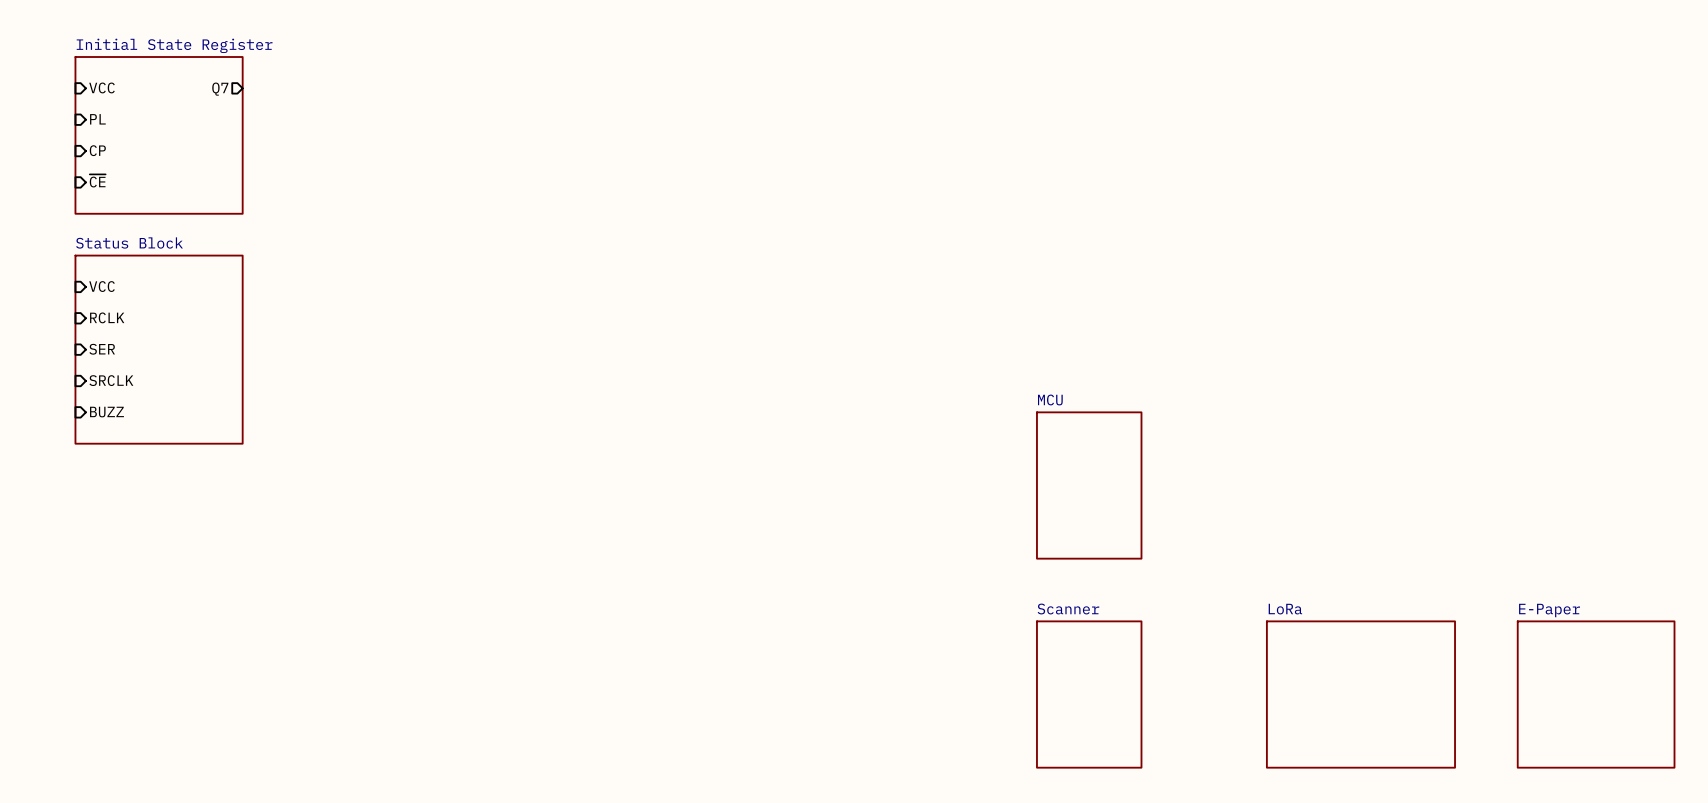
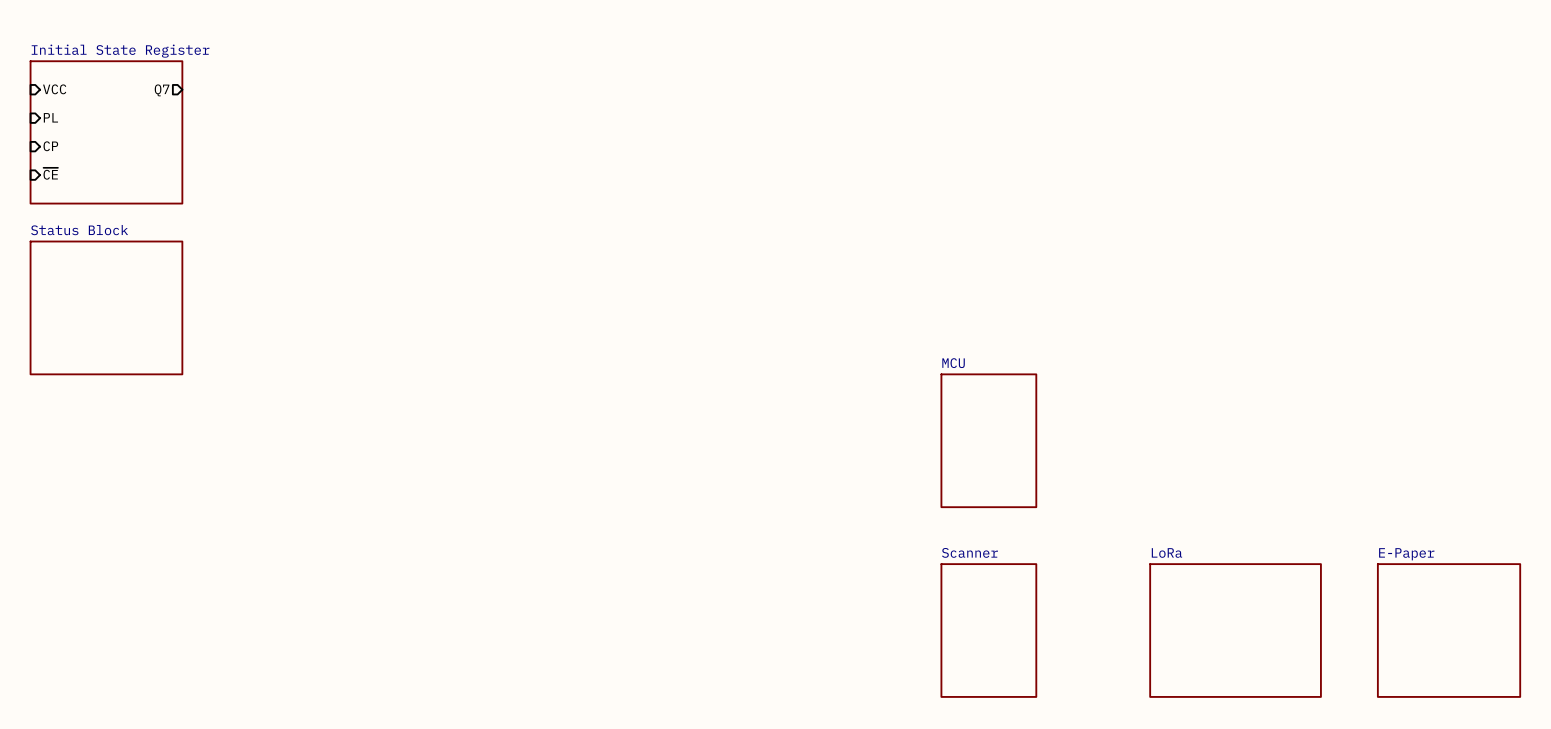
sheet pin position: VCC (102, 87) -> VCC (54, 89)
sheet pin position: Q7 (220, 89) -> Q7 (162, 90)
sheet pin position: PL (97, 119) -> PL (50, 117)
sheet Initial State Register position: (159, 135) -> (106, 132)
sheet pin position: CP (97, 150) -> CP (50, 146)
sheet pin position: ~{CE} (97, 180) -> ~{CE} (50, 173)
sheet pin: VCC (102, 286) -> none
sheet pin: RCLK (107, 317) -> none
sheet Status Block: none -> (106, 307)
sheet pin: SER (102, 349) -> none
sheet Status Block: (159, 349) -> none
sheet pin: SRCLK (111, 380) -> none
sheet pin: BUZZ (106, 412) -> none

